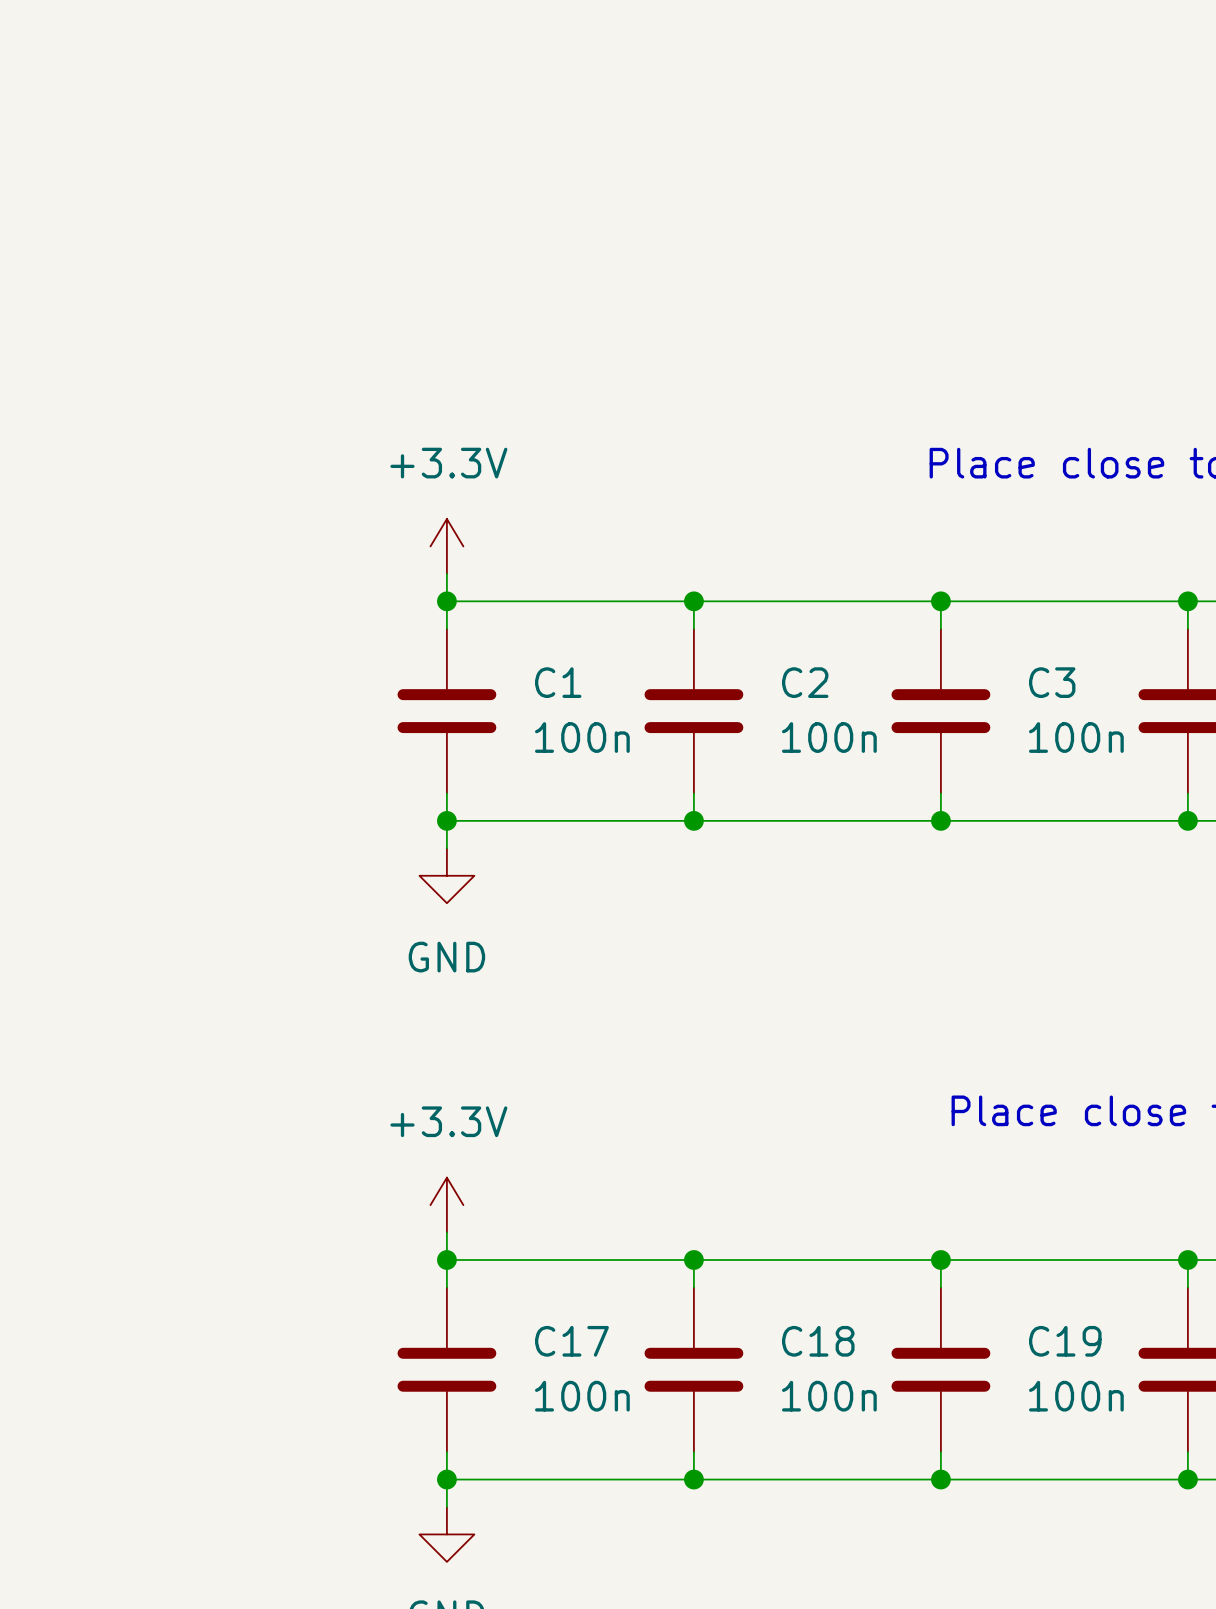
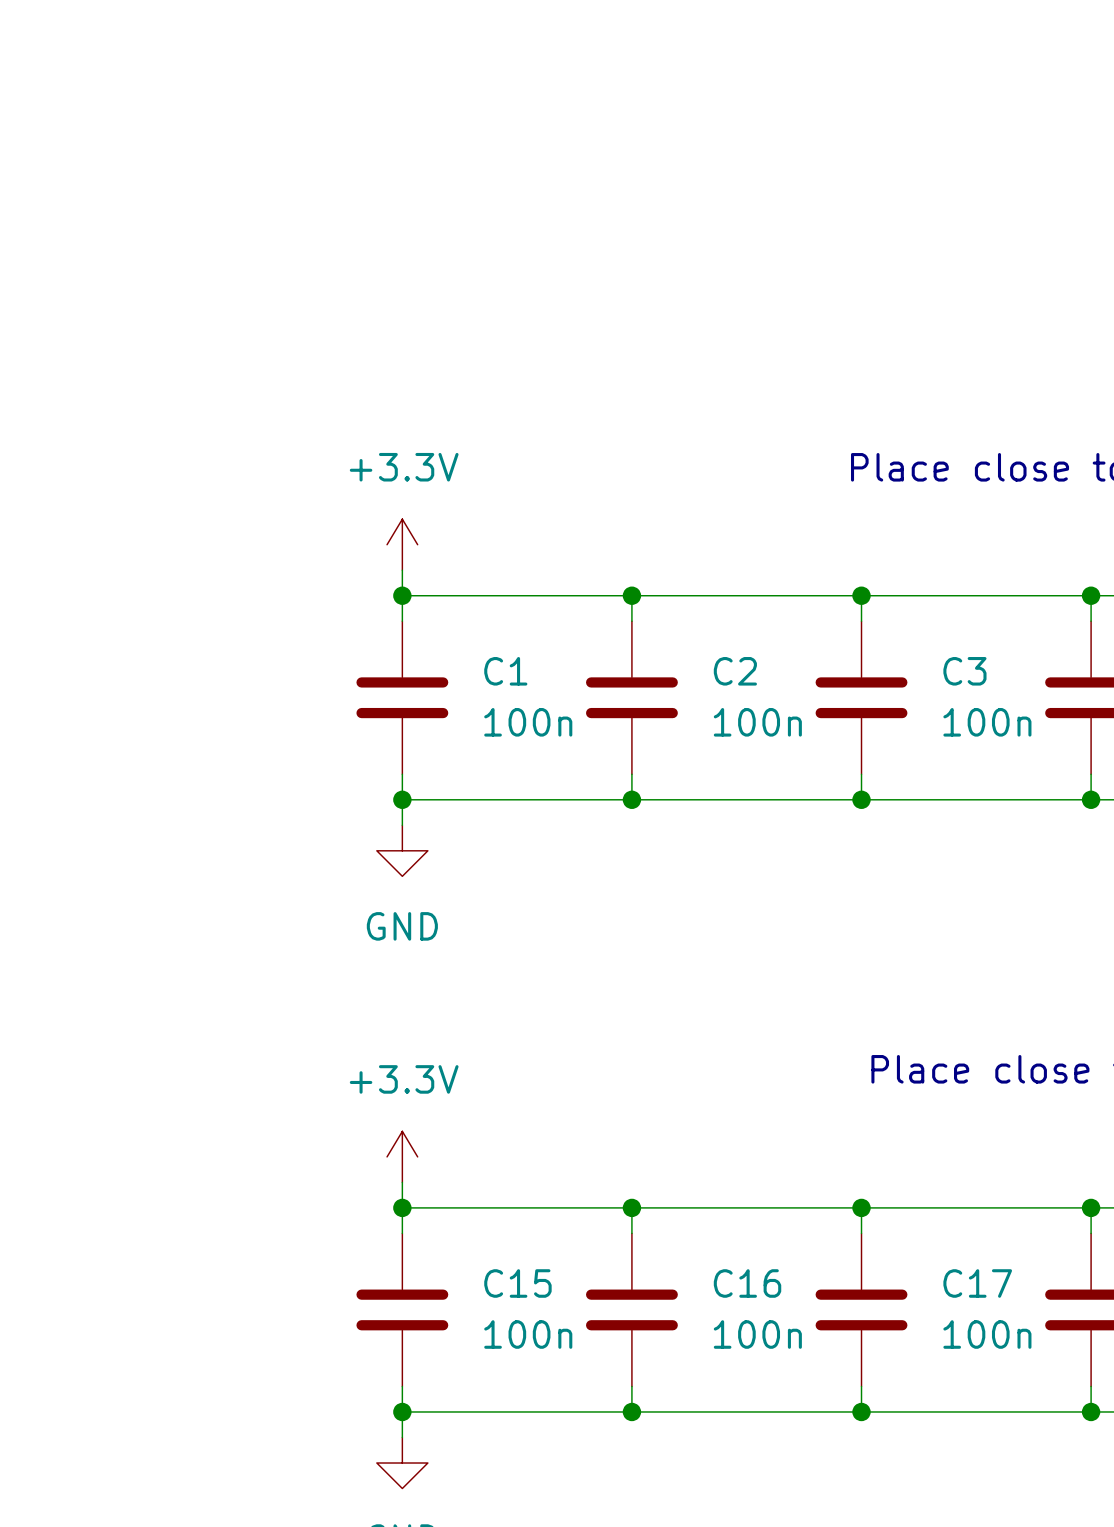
C17 name: C17 (571, 1341) -> C15 (517, 1283)
C18 name: C18 (818, 1341) -> C16 (747, 1283)
C19 name: C19 (1065, 1341) -> C17 (977, 1283)

